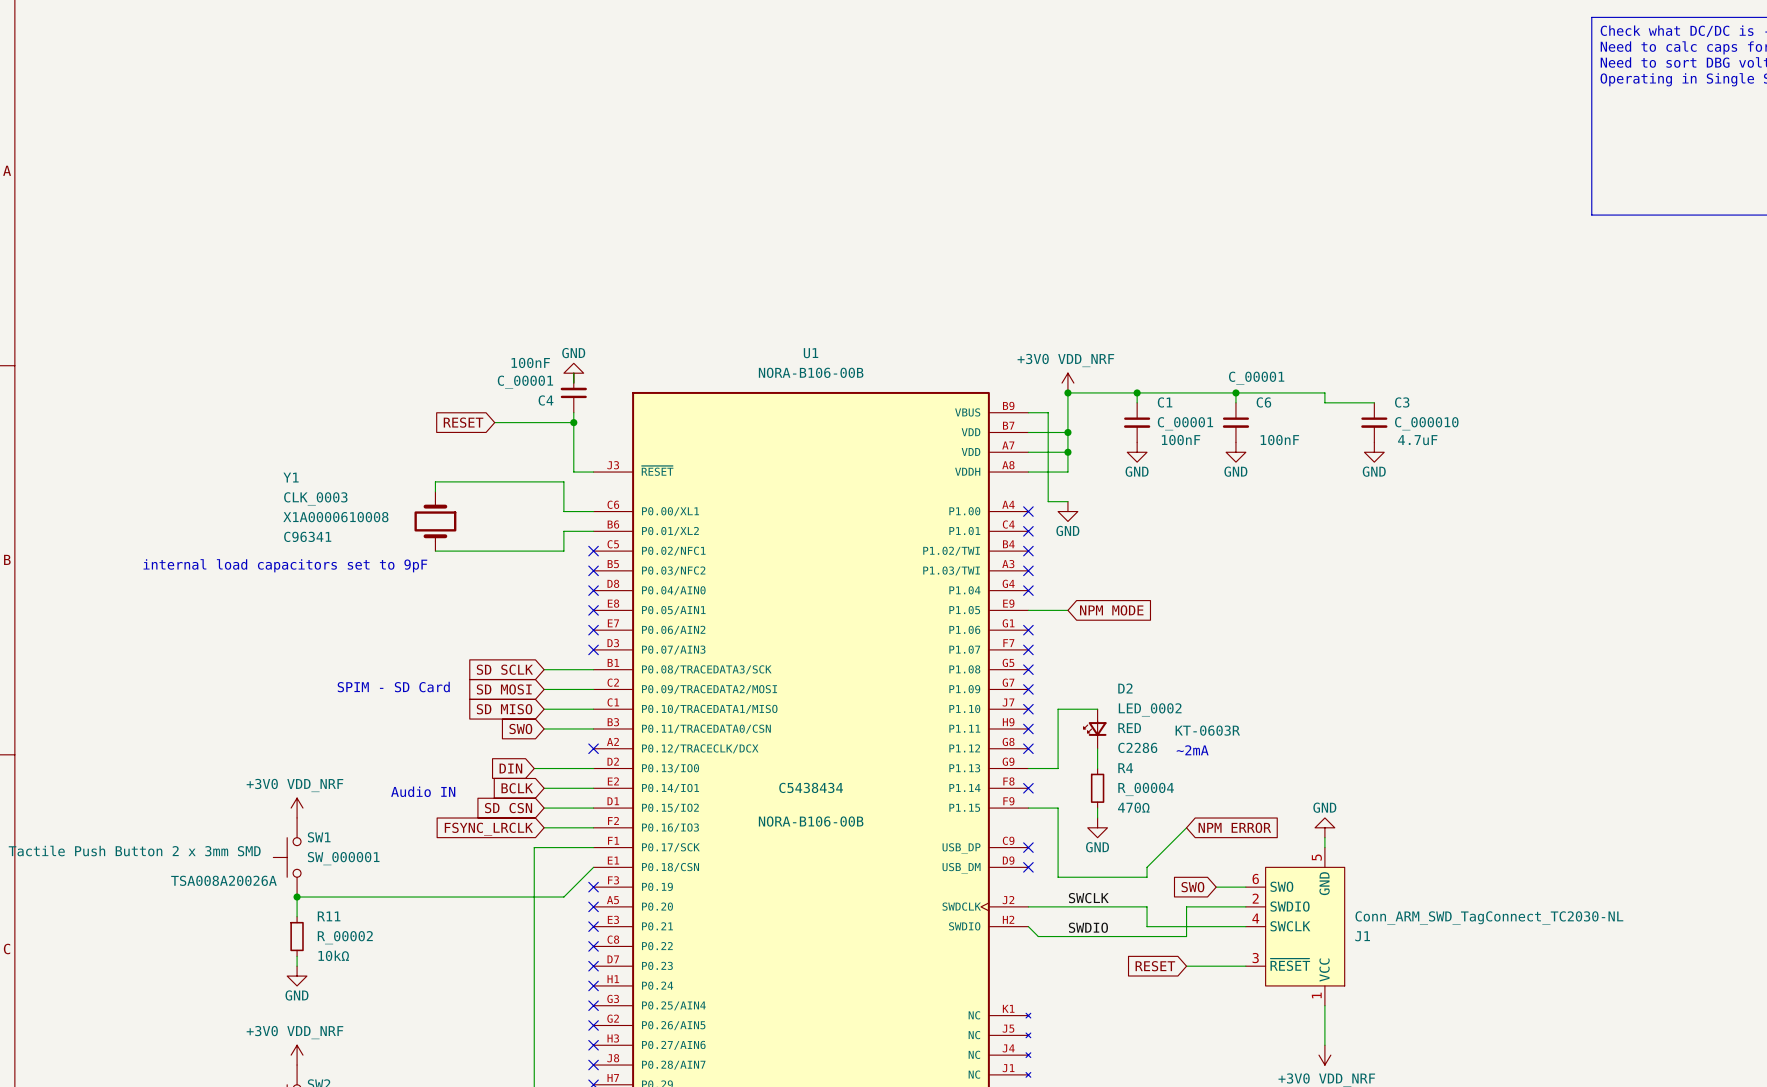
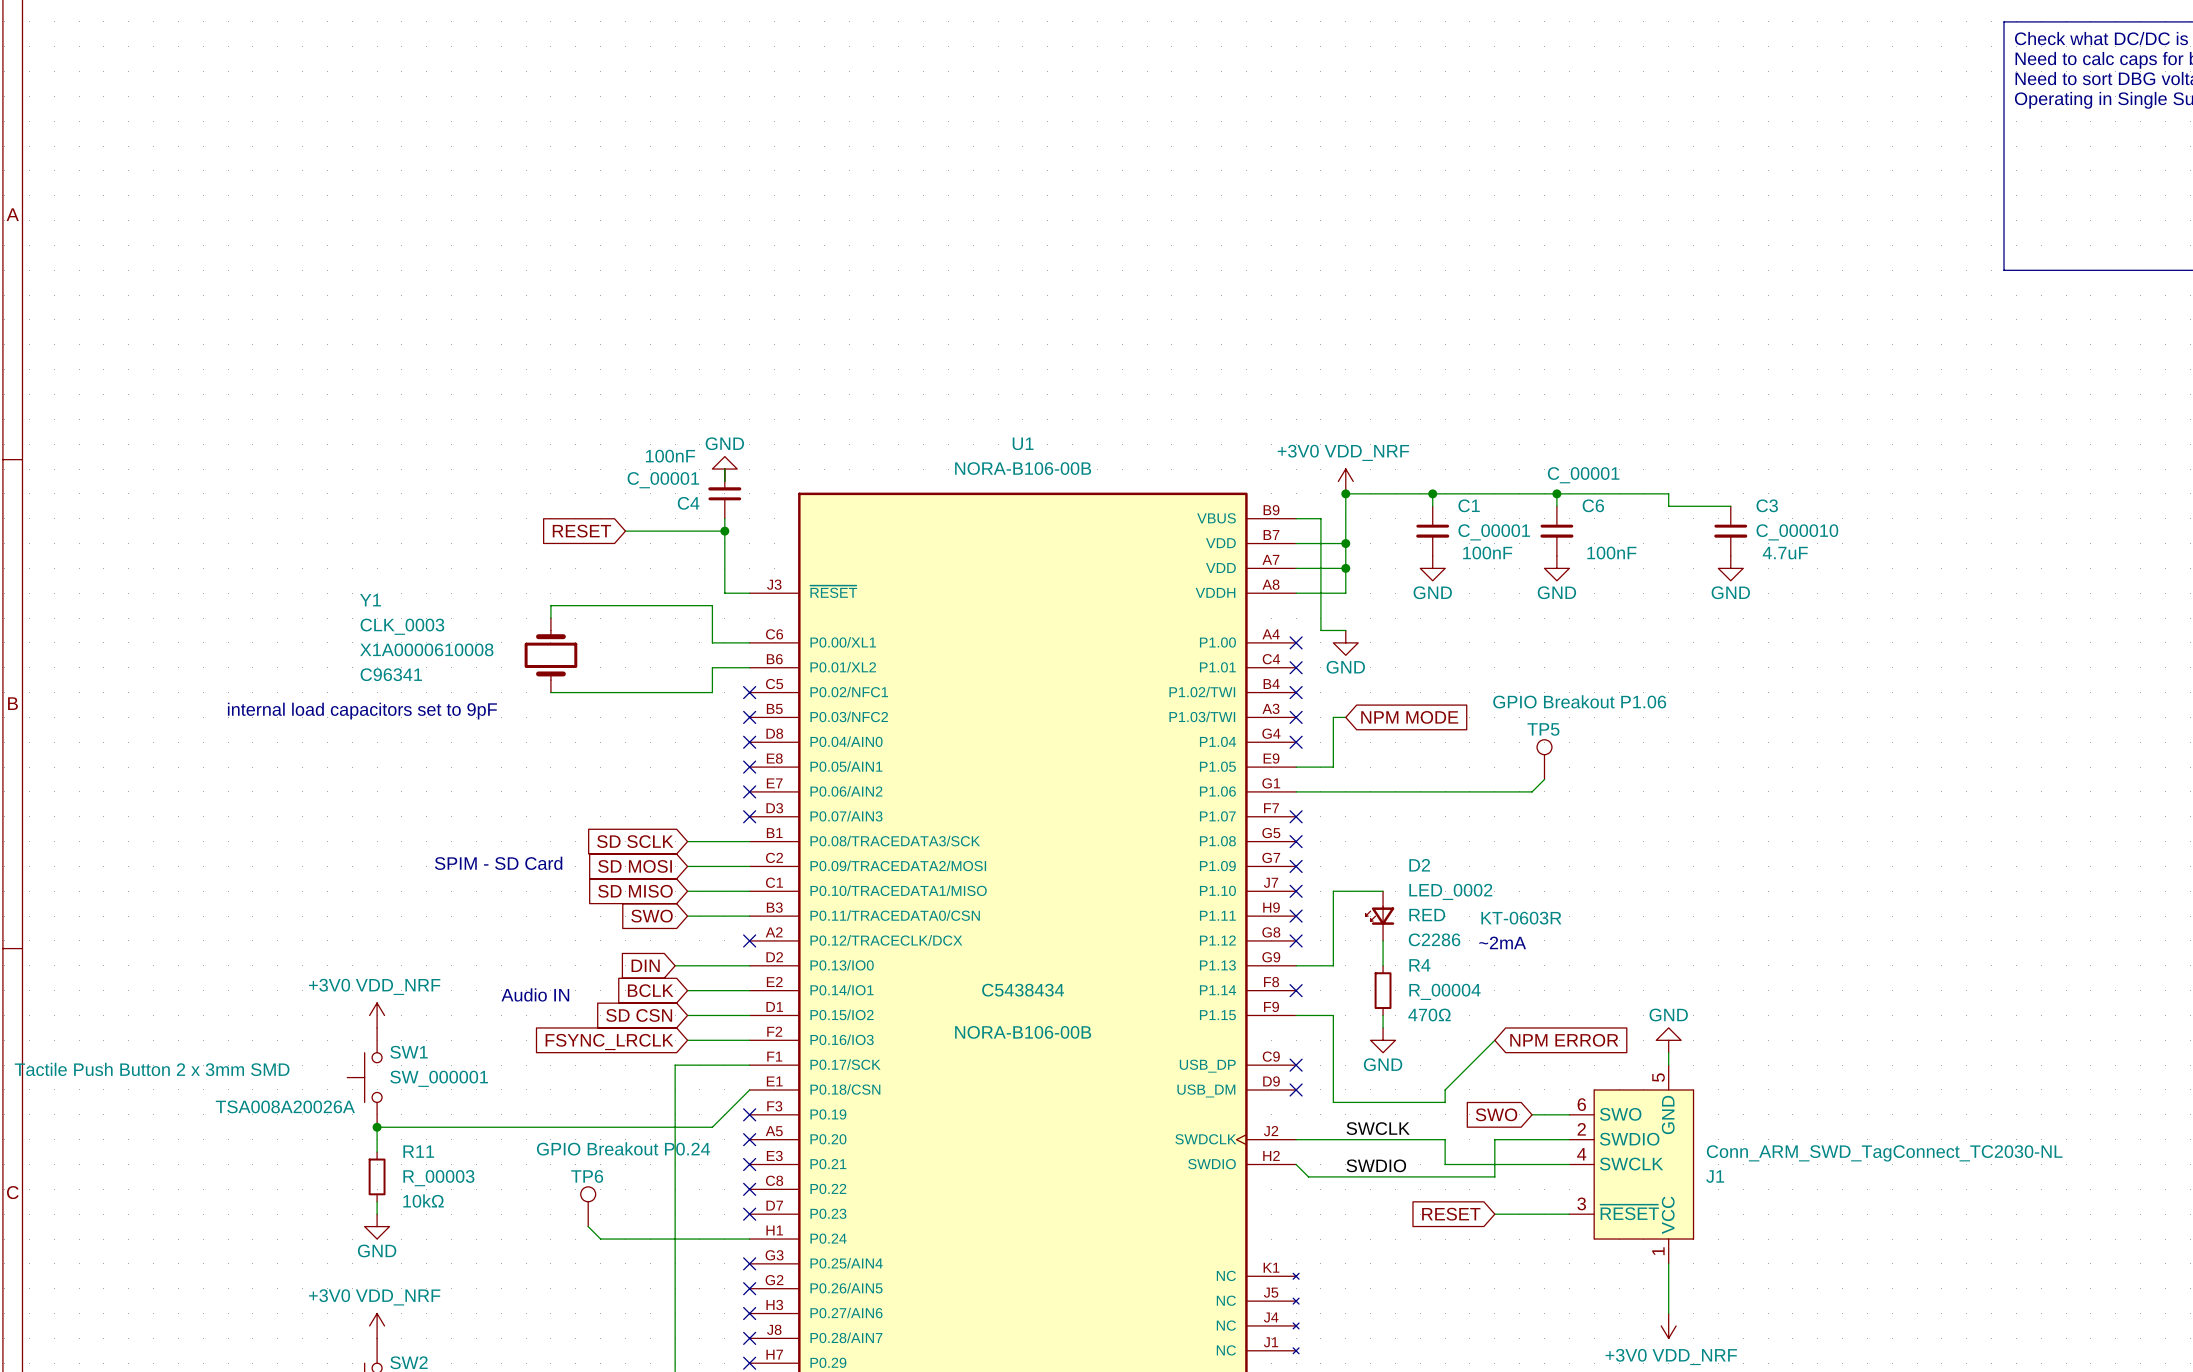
TP5: none -> GPIO Breakout P1.06 (1544, 759)
wire: (1058, 610) (1067, 610) -> (1333, 767) (1333, 717) (1345, 717)
global label position: NPM MODE (1111, 610) -> NPM MODE (1409, 717)
wire: none -> (1544, 779) (1532, 791) (1296, 791)
no-connect mark: (1028, 630) -> none
R11 value: R_00002 (345, 937) -> R_00003 (438, 1178)
TP6: none -> GPIO Breakout P0.24 (588, 1206)
wire: none -> (588, 1226) (600, 1239) (749, 1239)
no-connect mark: (593, 985) -> none

